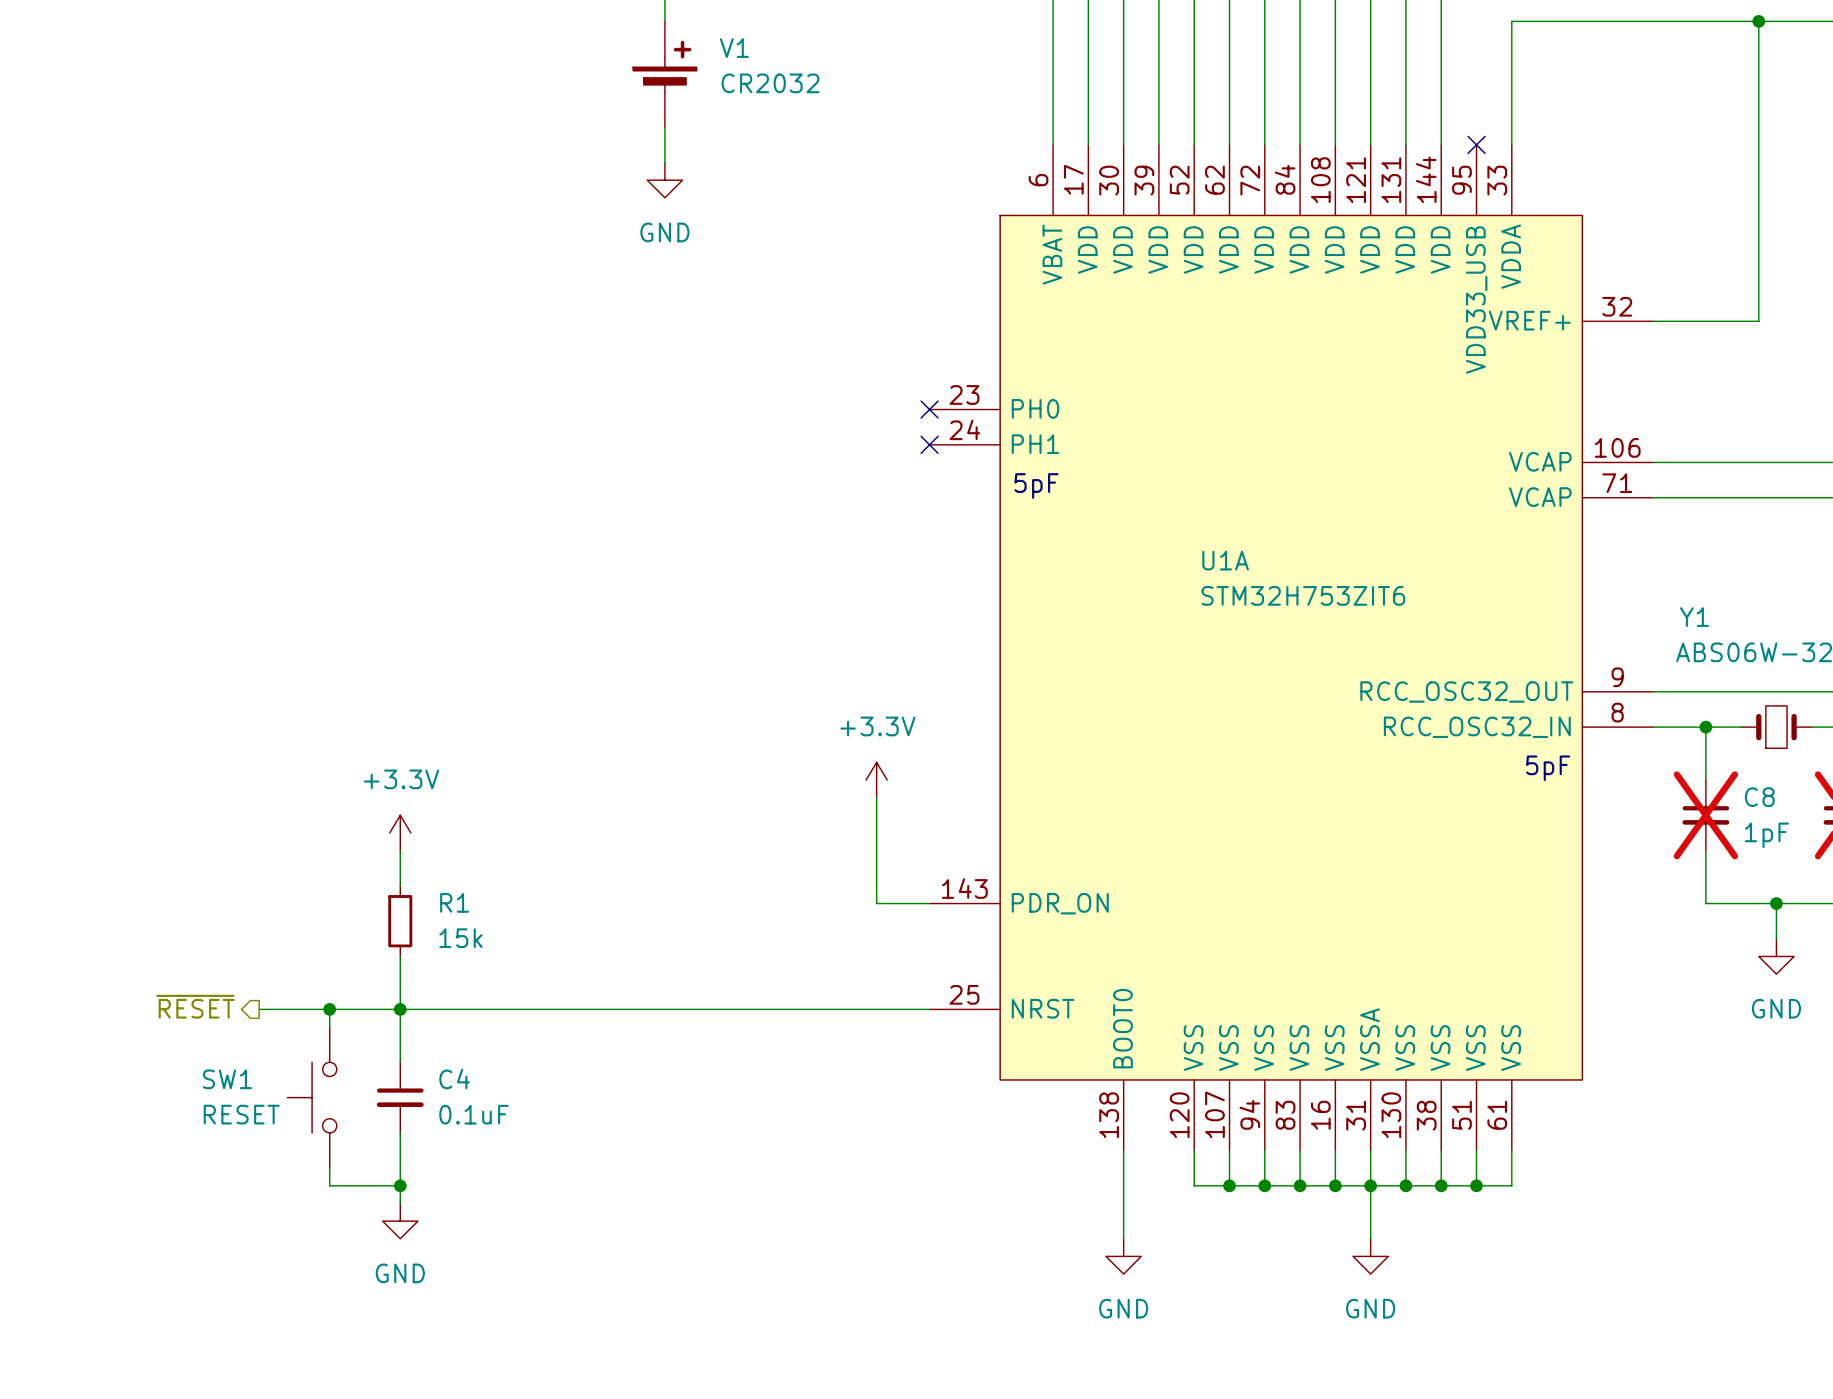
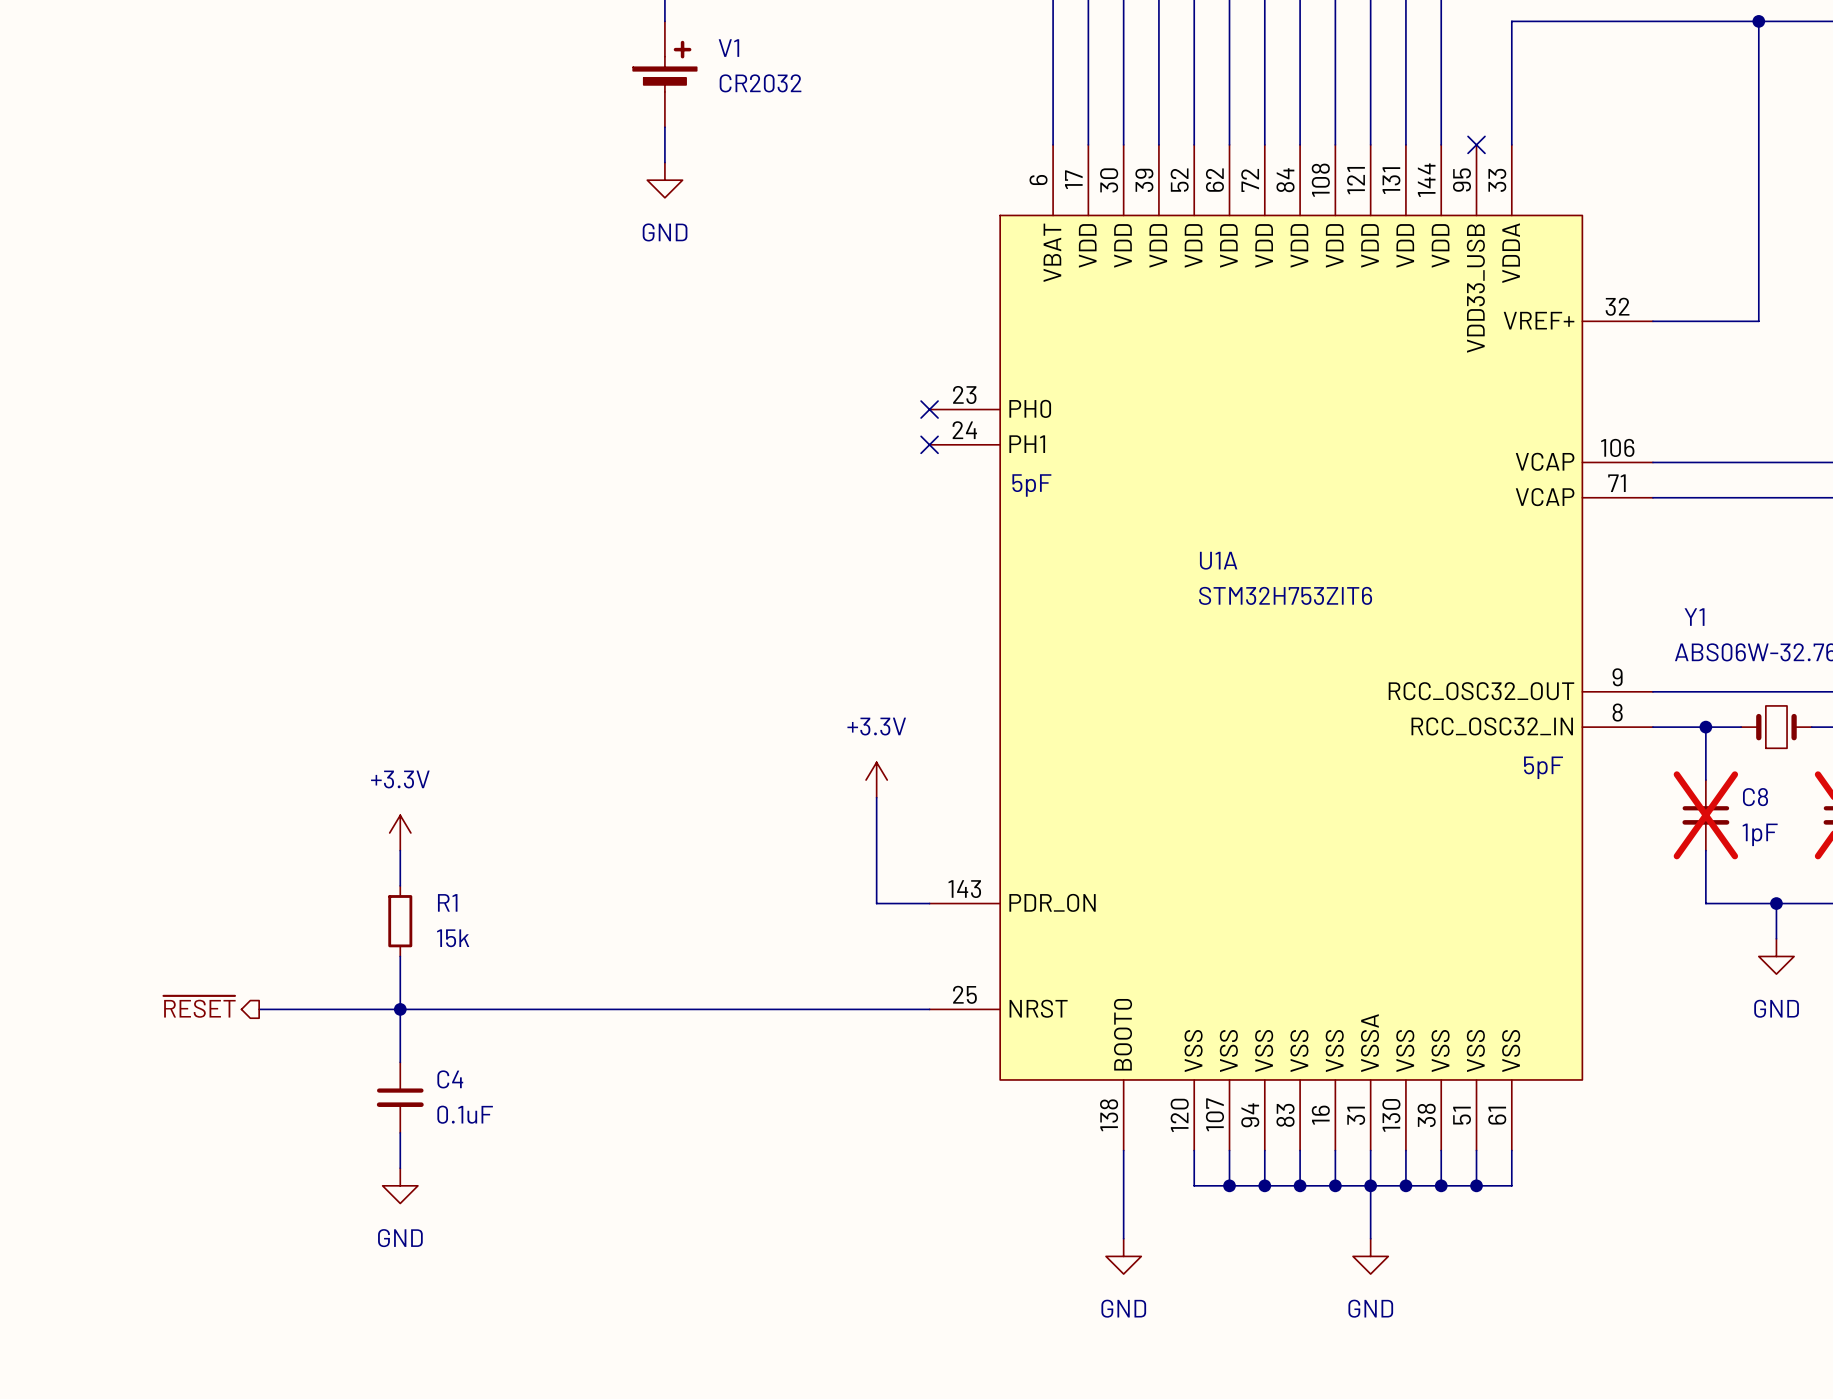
wire: (329, 1009) (329, 1027) -> none
junction: (329, 1009) -> none
SW1: RESET (312, 1097) -> none
wire: (329, 1168) (329, 1185) (400, 1185) -> none
junction: (400, 1185) -> none
power symbol position: GND (400, 1221) -> GND (400, 1185)

